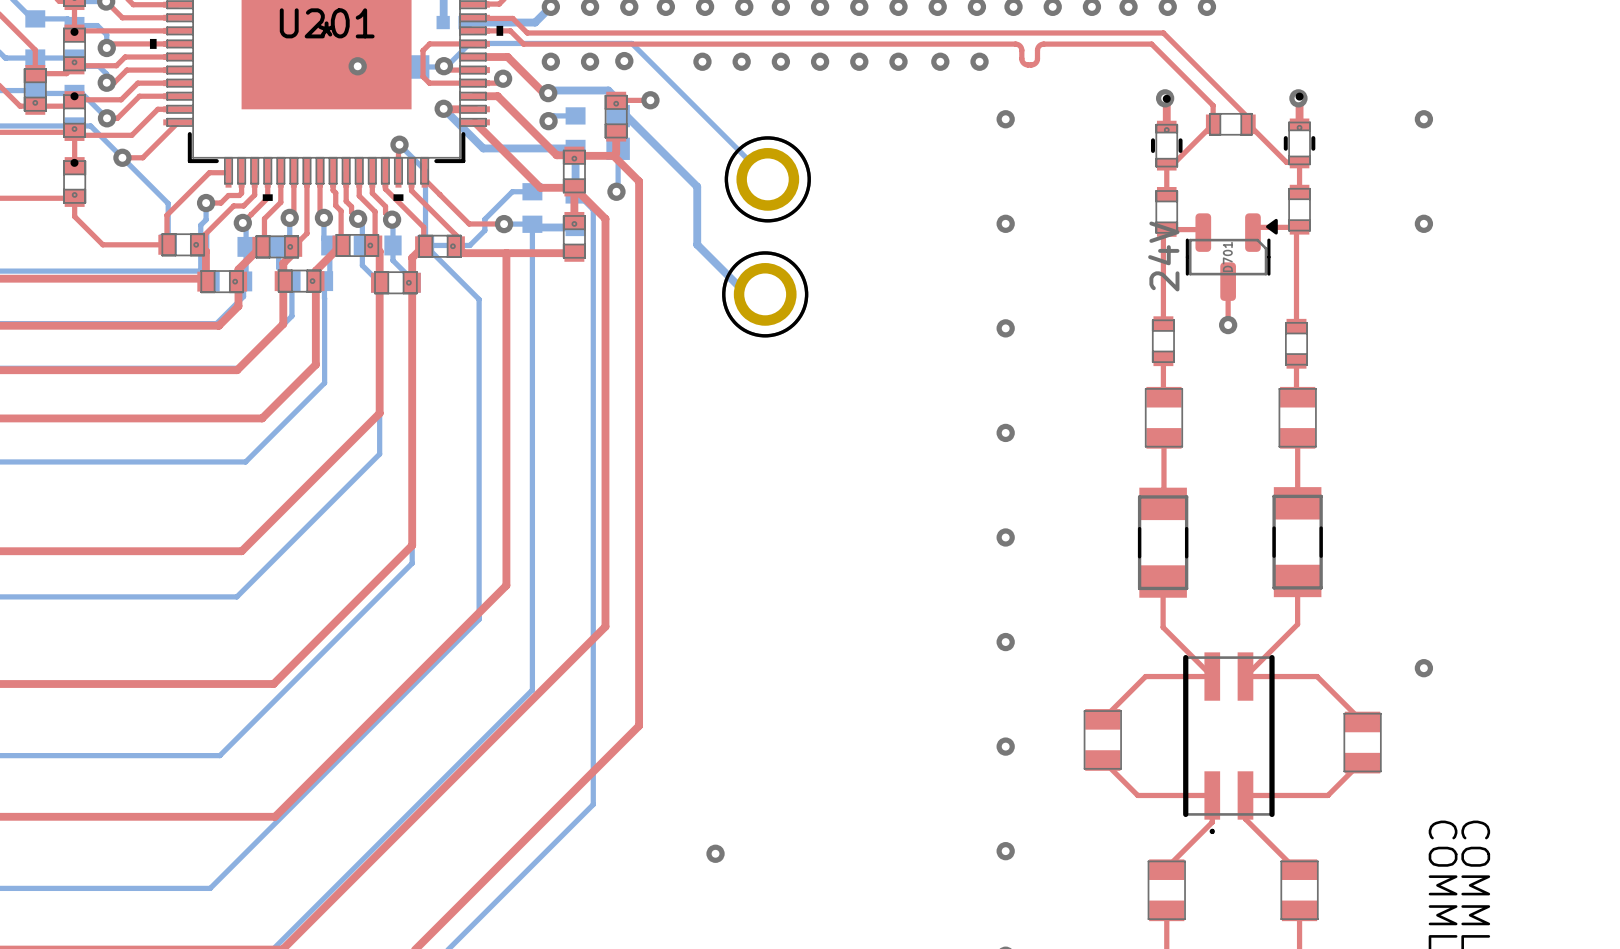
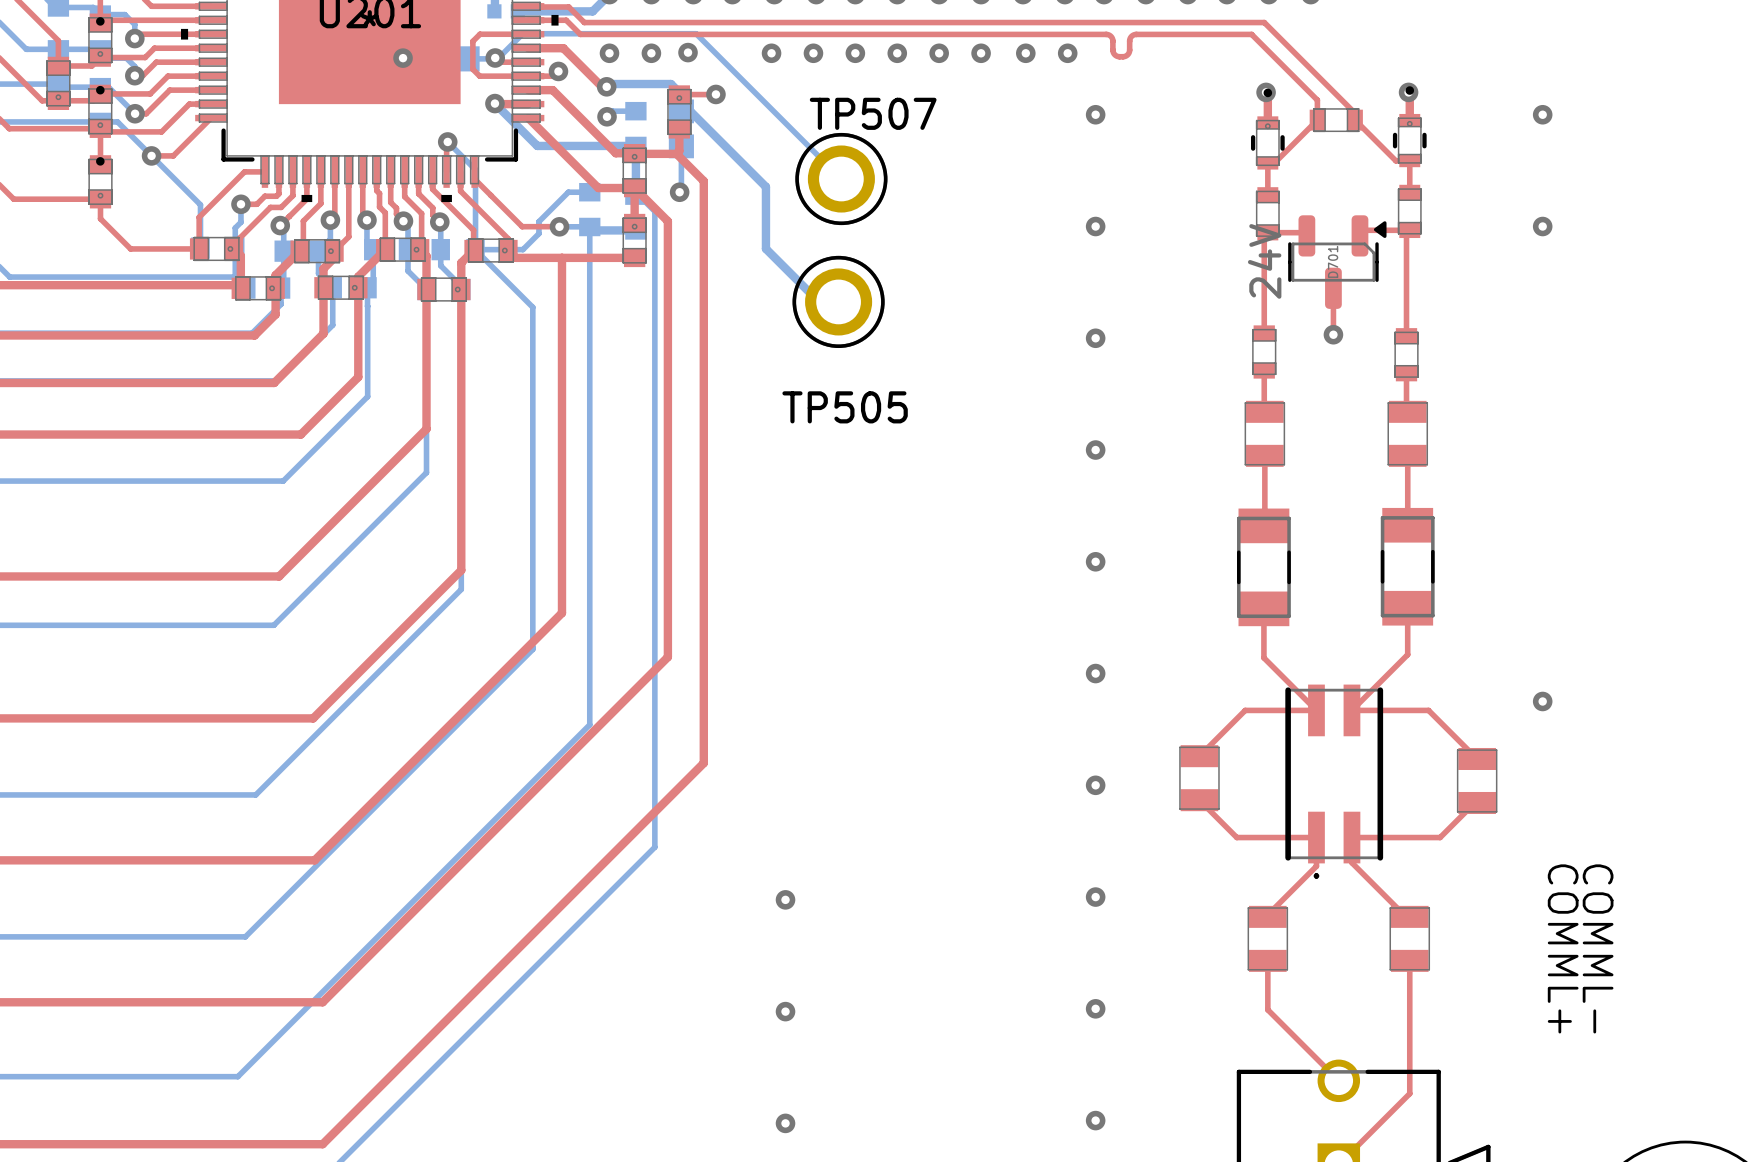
TP507 name: none -> TP507 (873, 113)
TP505 name: none -> TP505 (845, 407)

